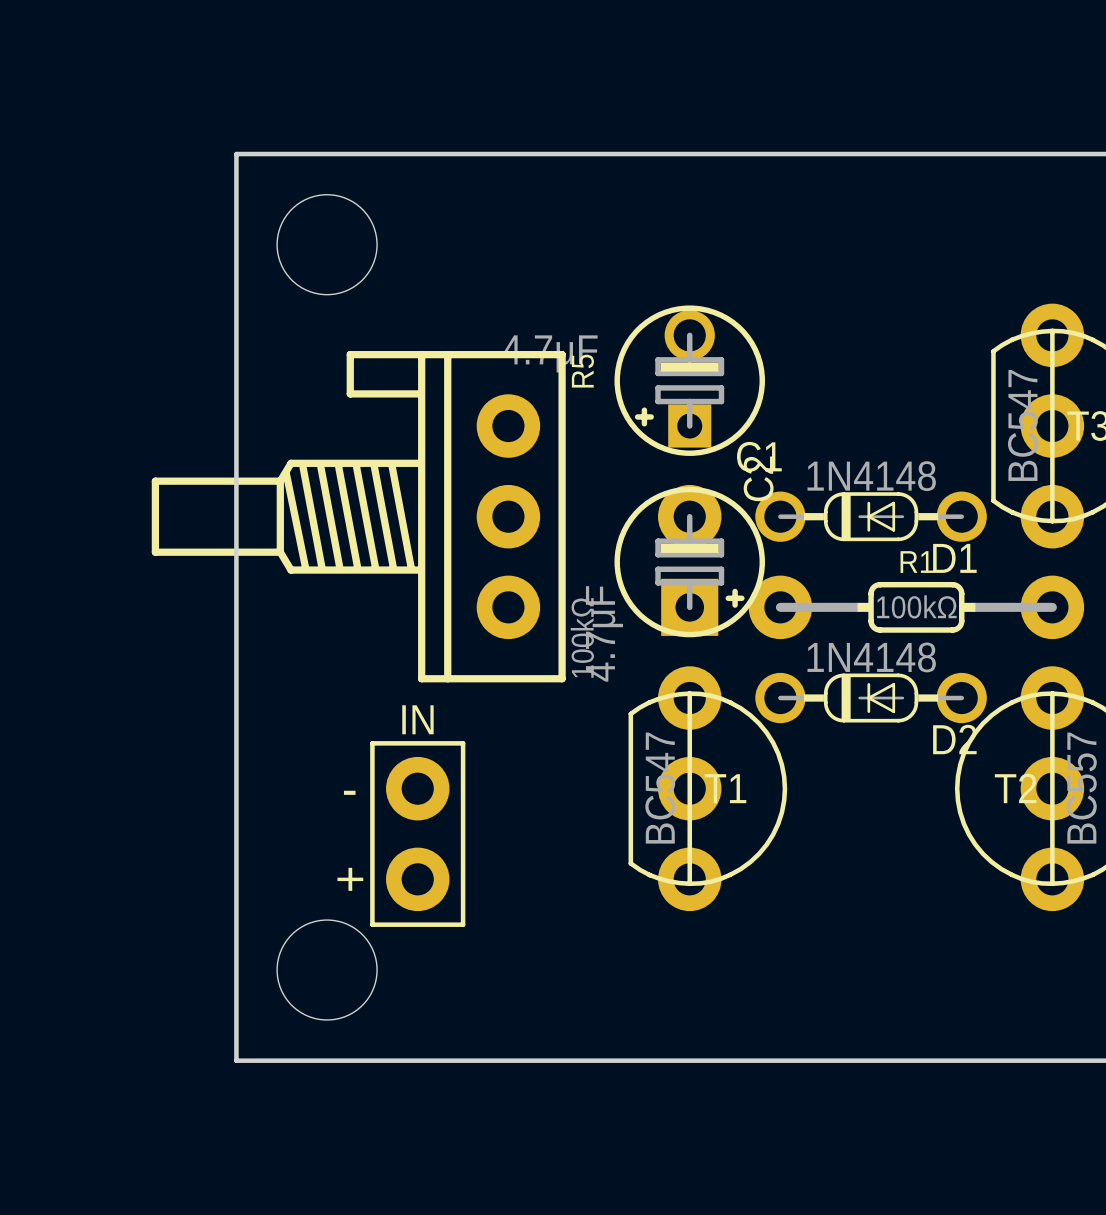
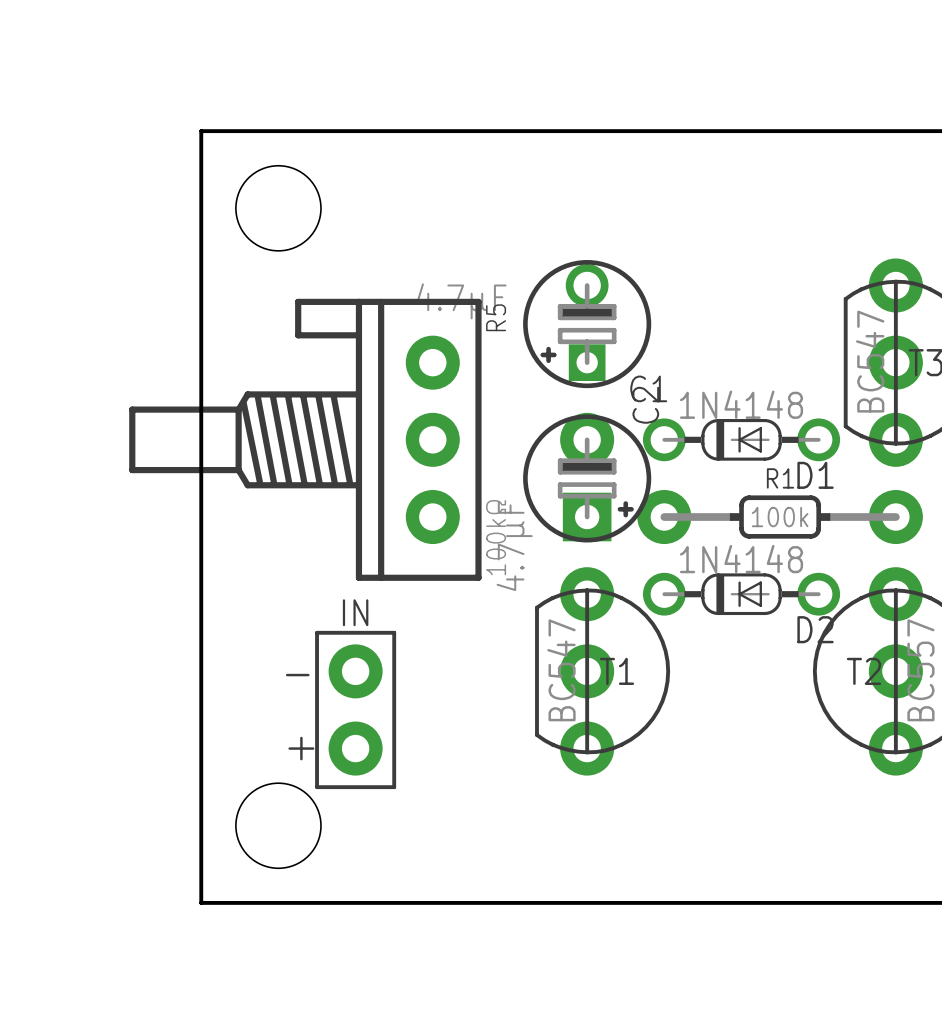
R1 value: 100kΩ (916, 606) -> 100k (780, 517)

